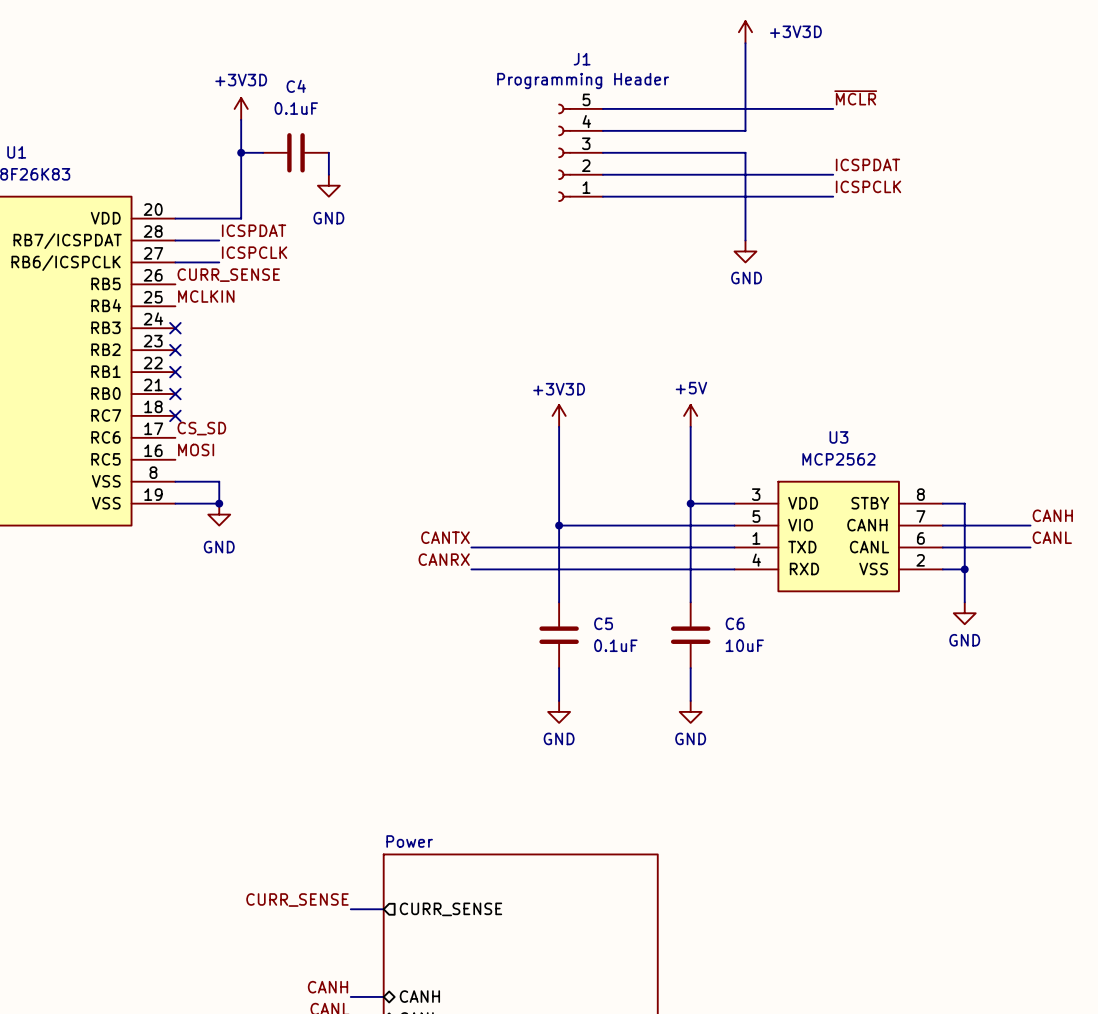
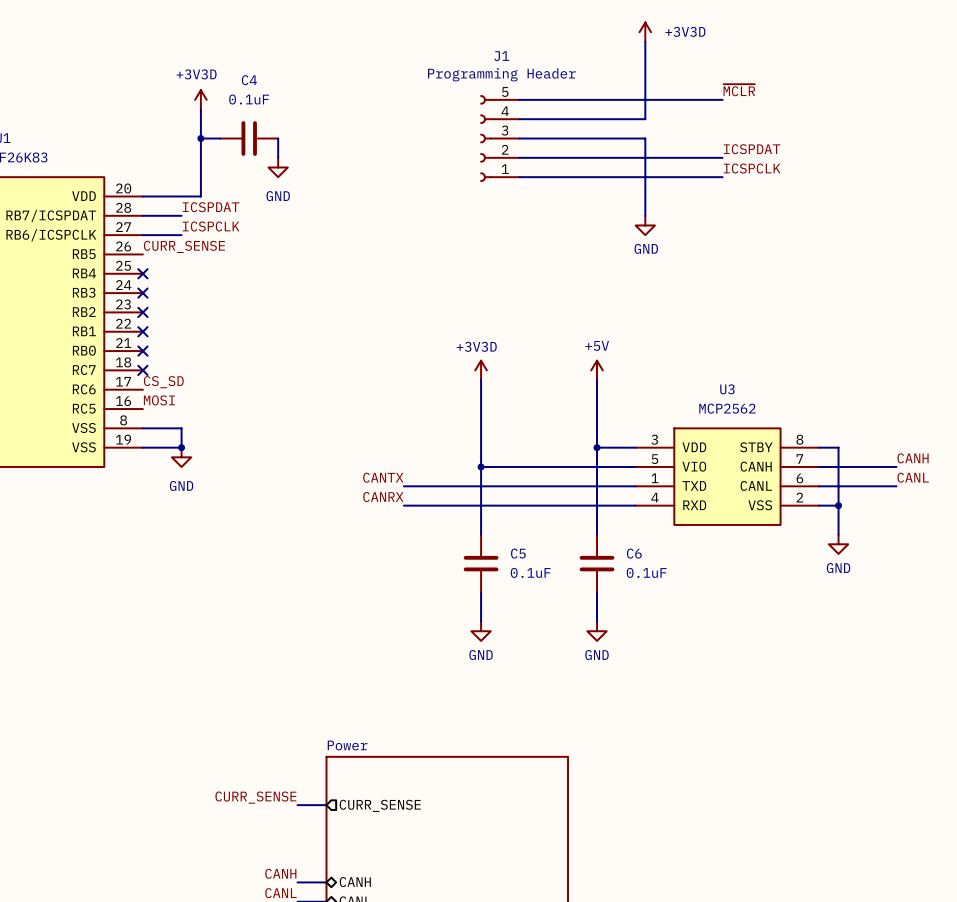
label: MCLKIN (206, 296) -> none
no-connect mark: none -> (142, 273)
C6 value: 10uF (744, 645) -> 0.1uF (646, 572)

